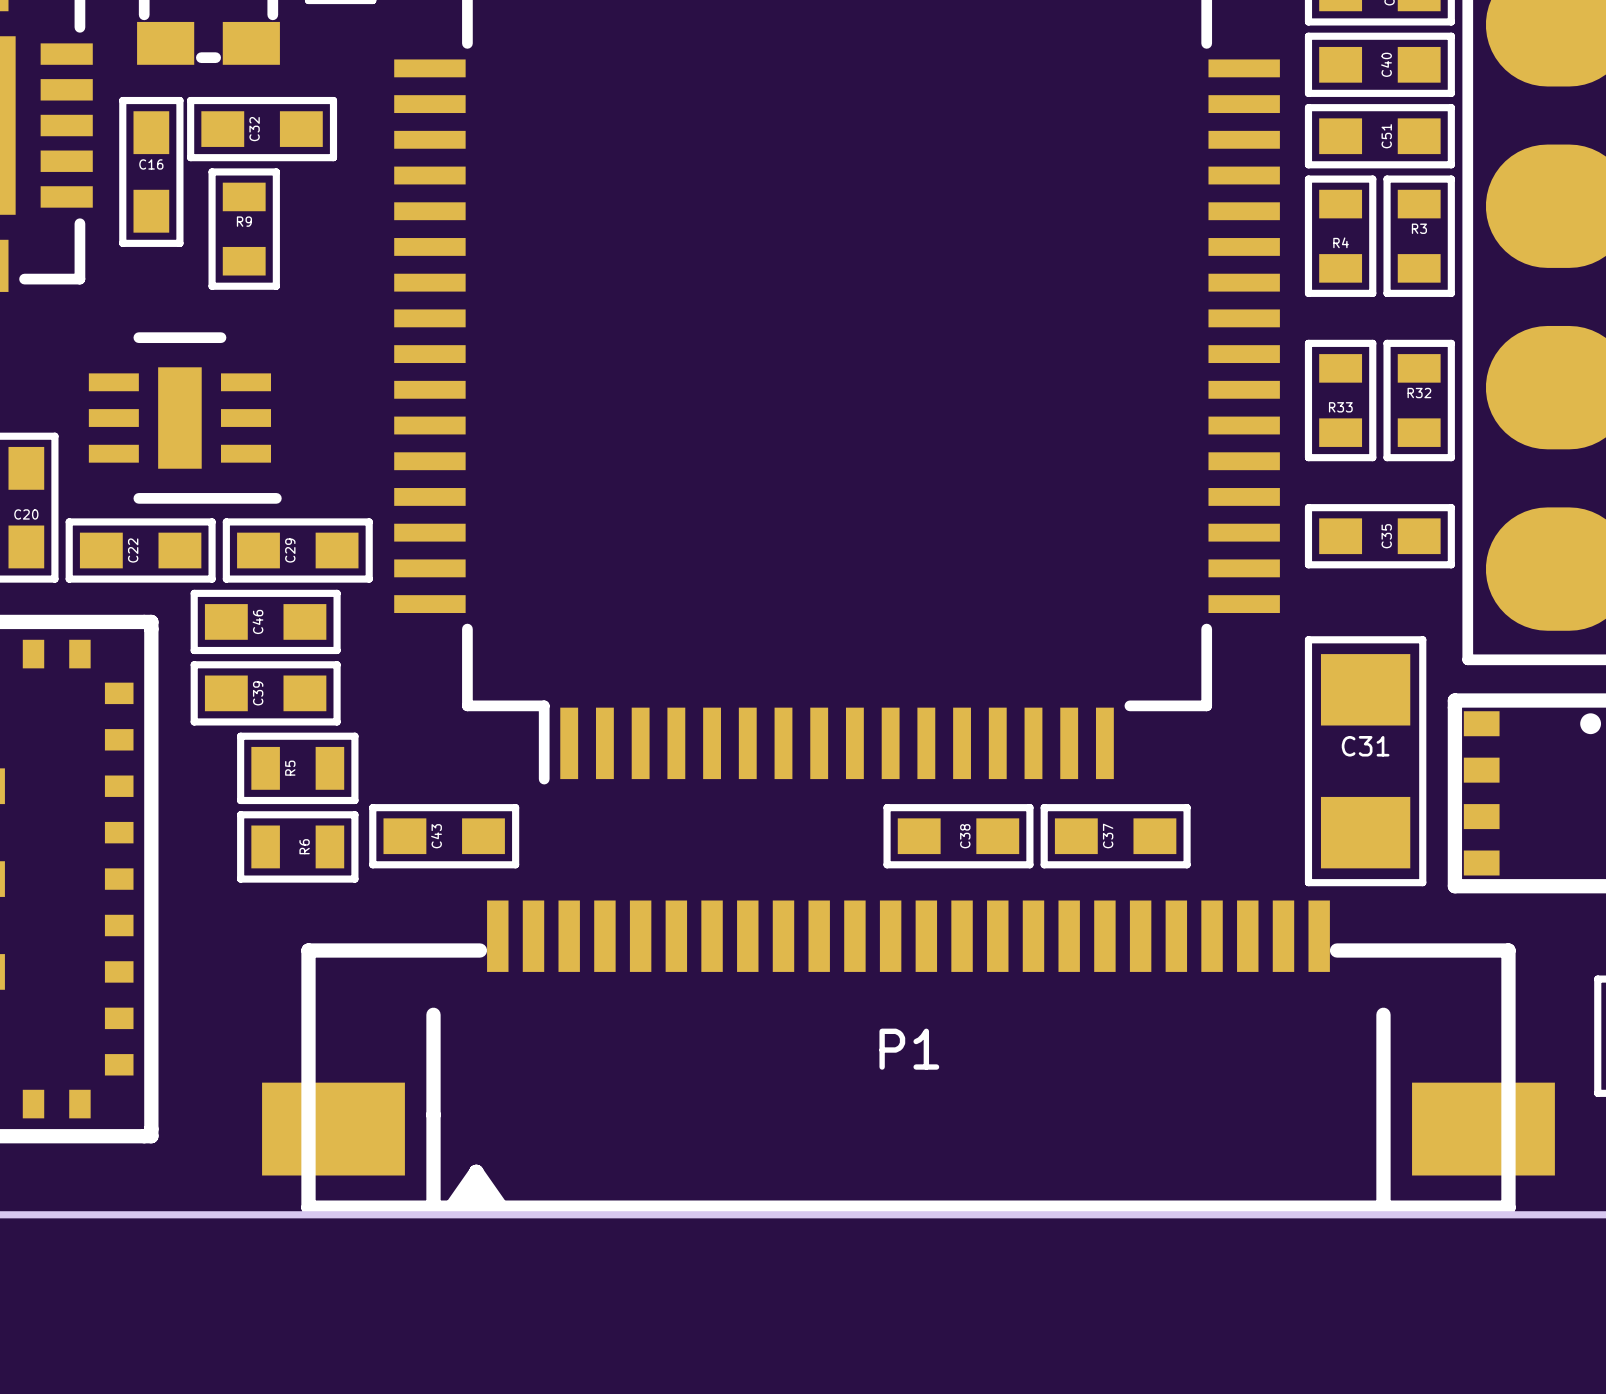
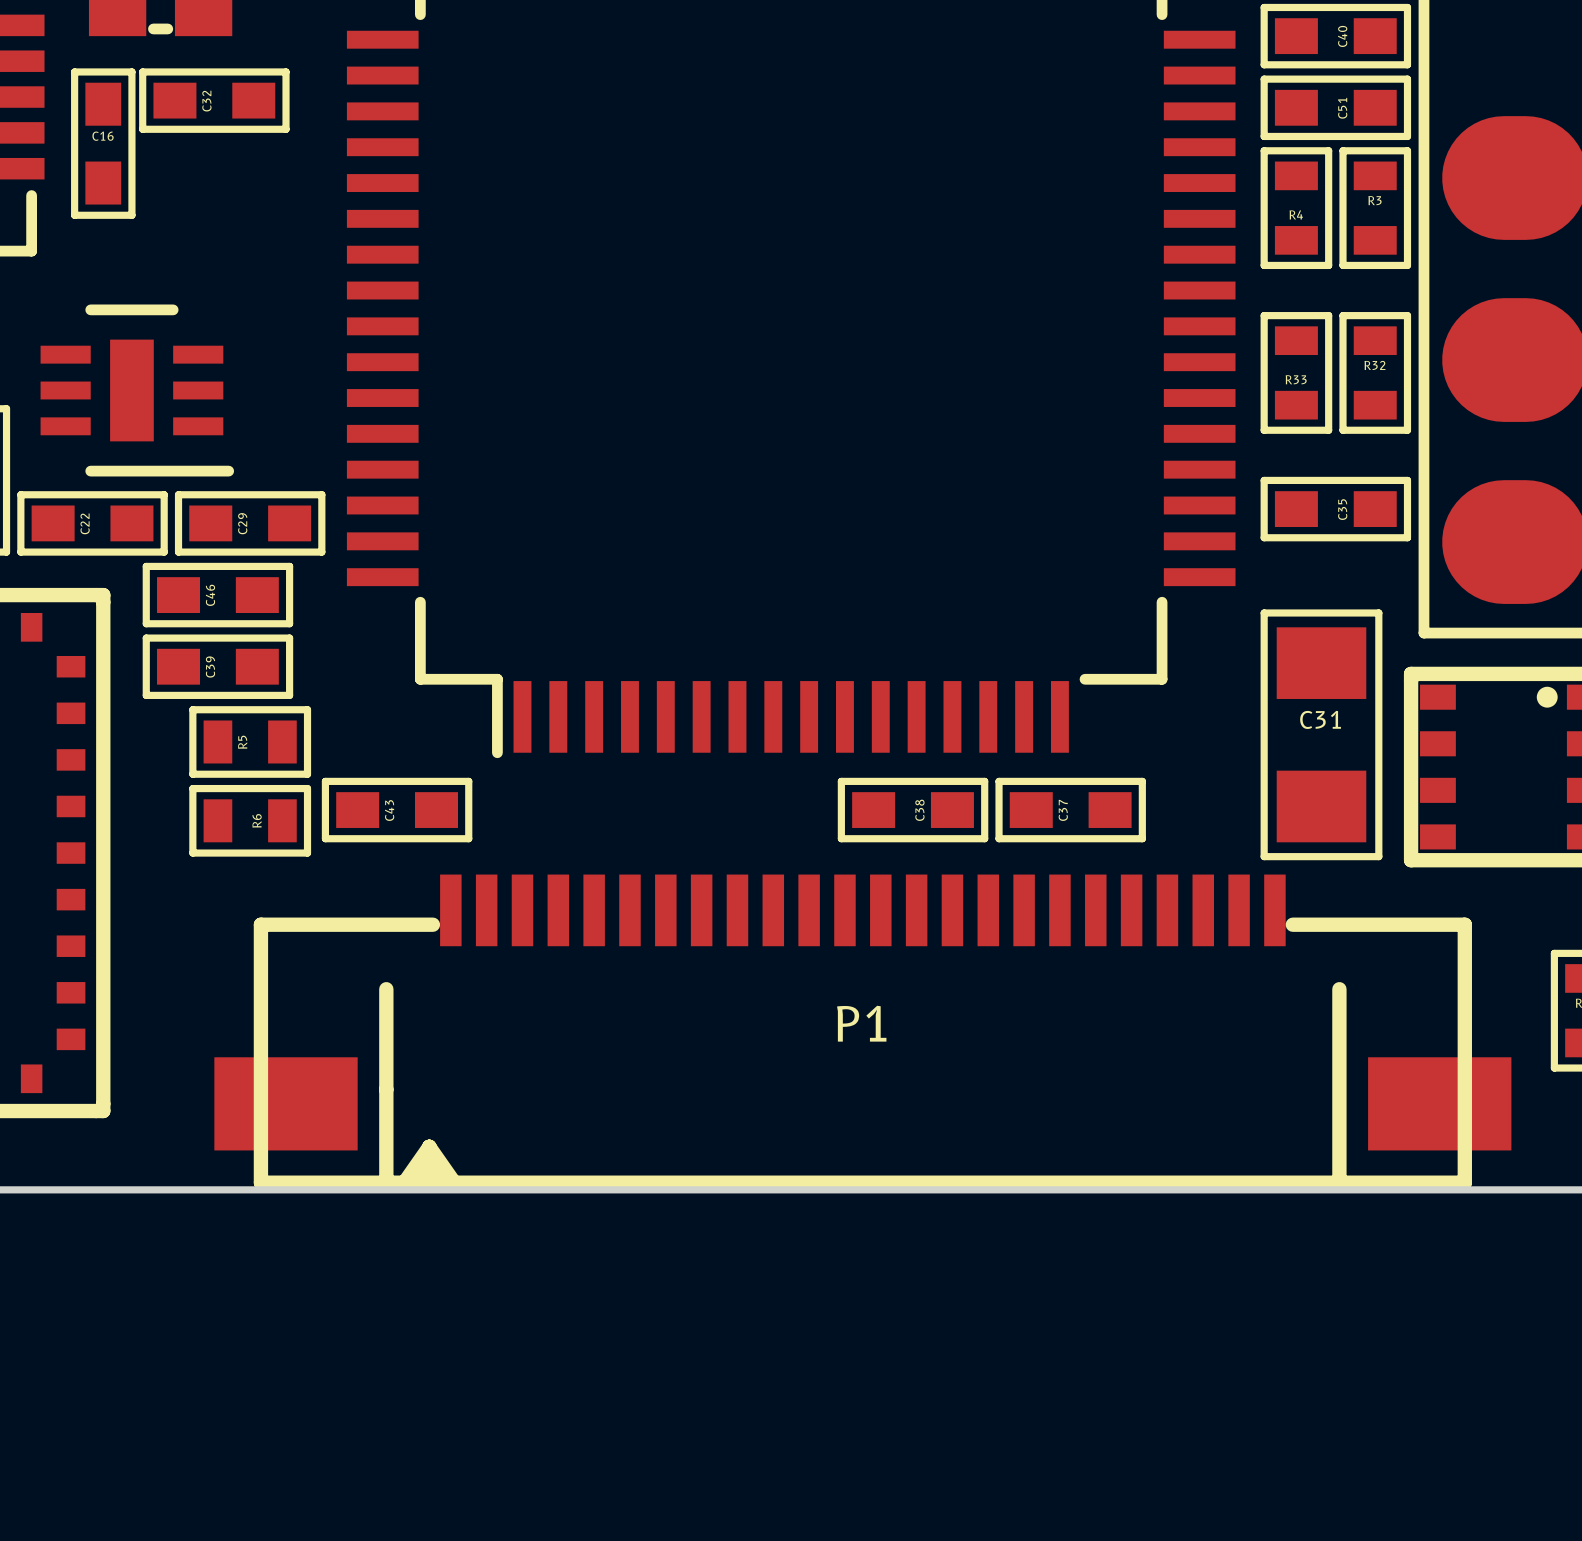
R9: (244, 229) -> none

